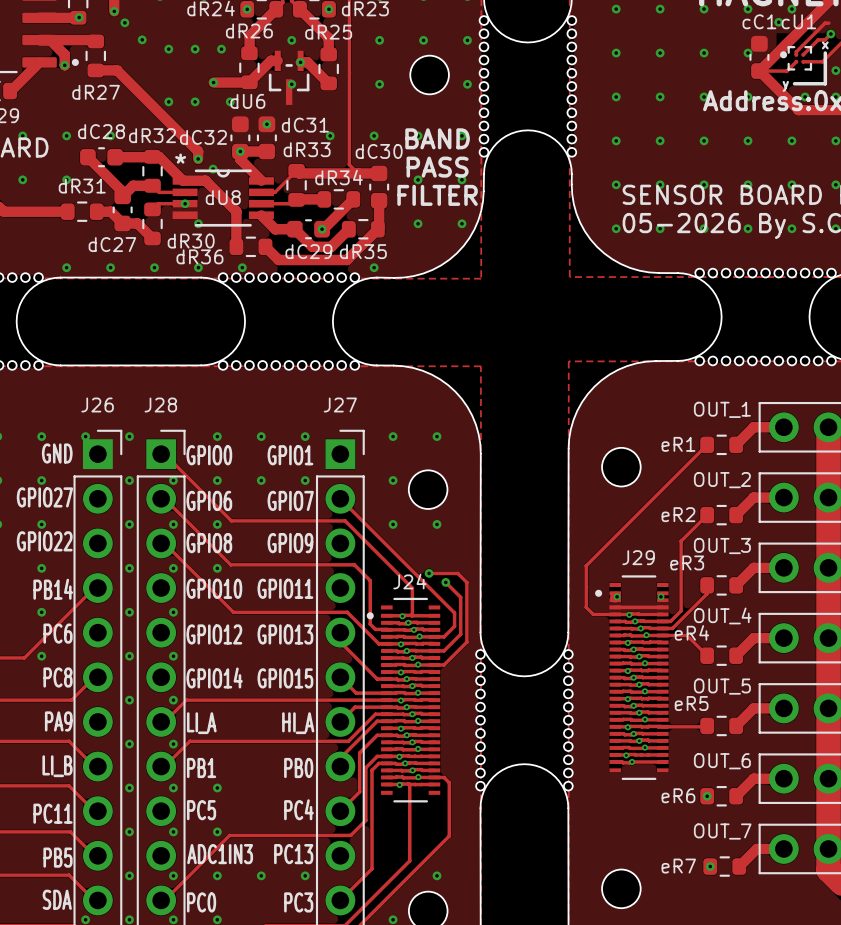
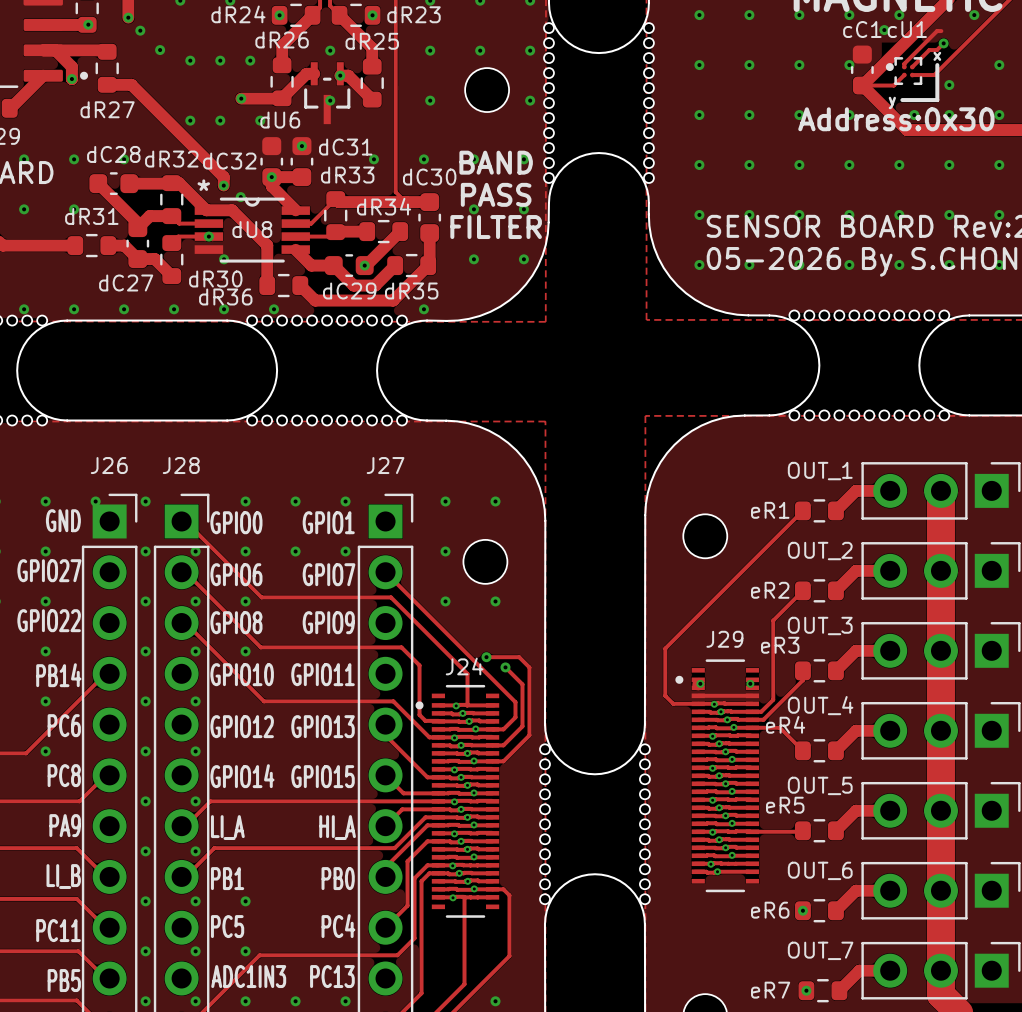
via: none -> (24, 309)

